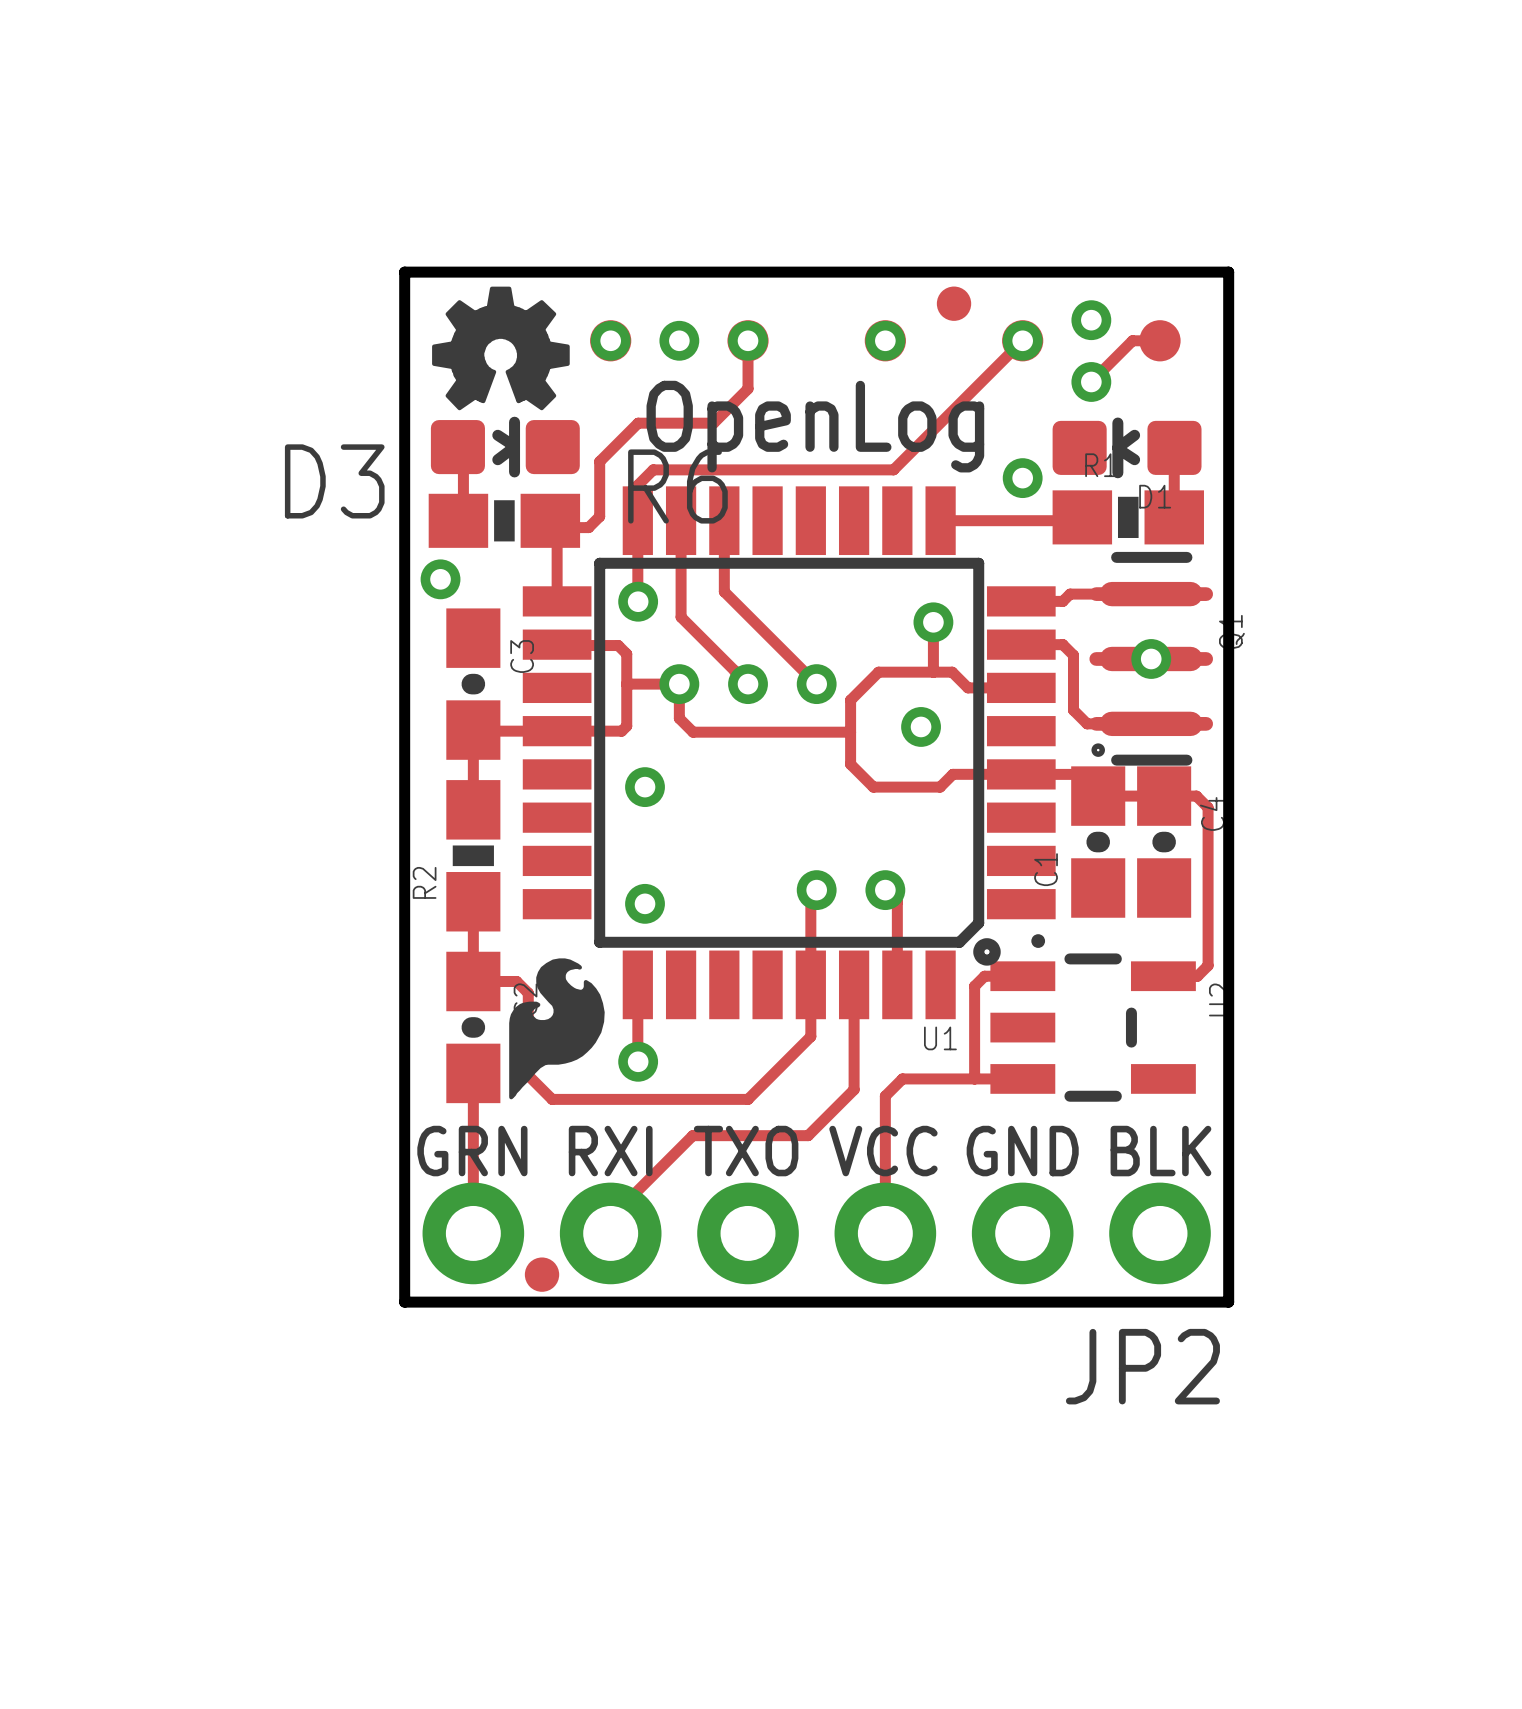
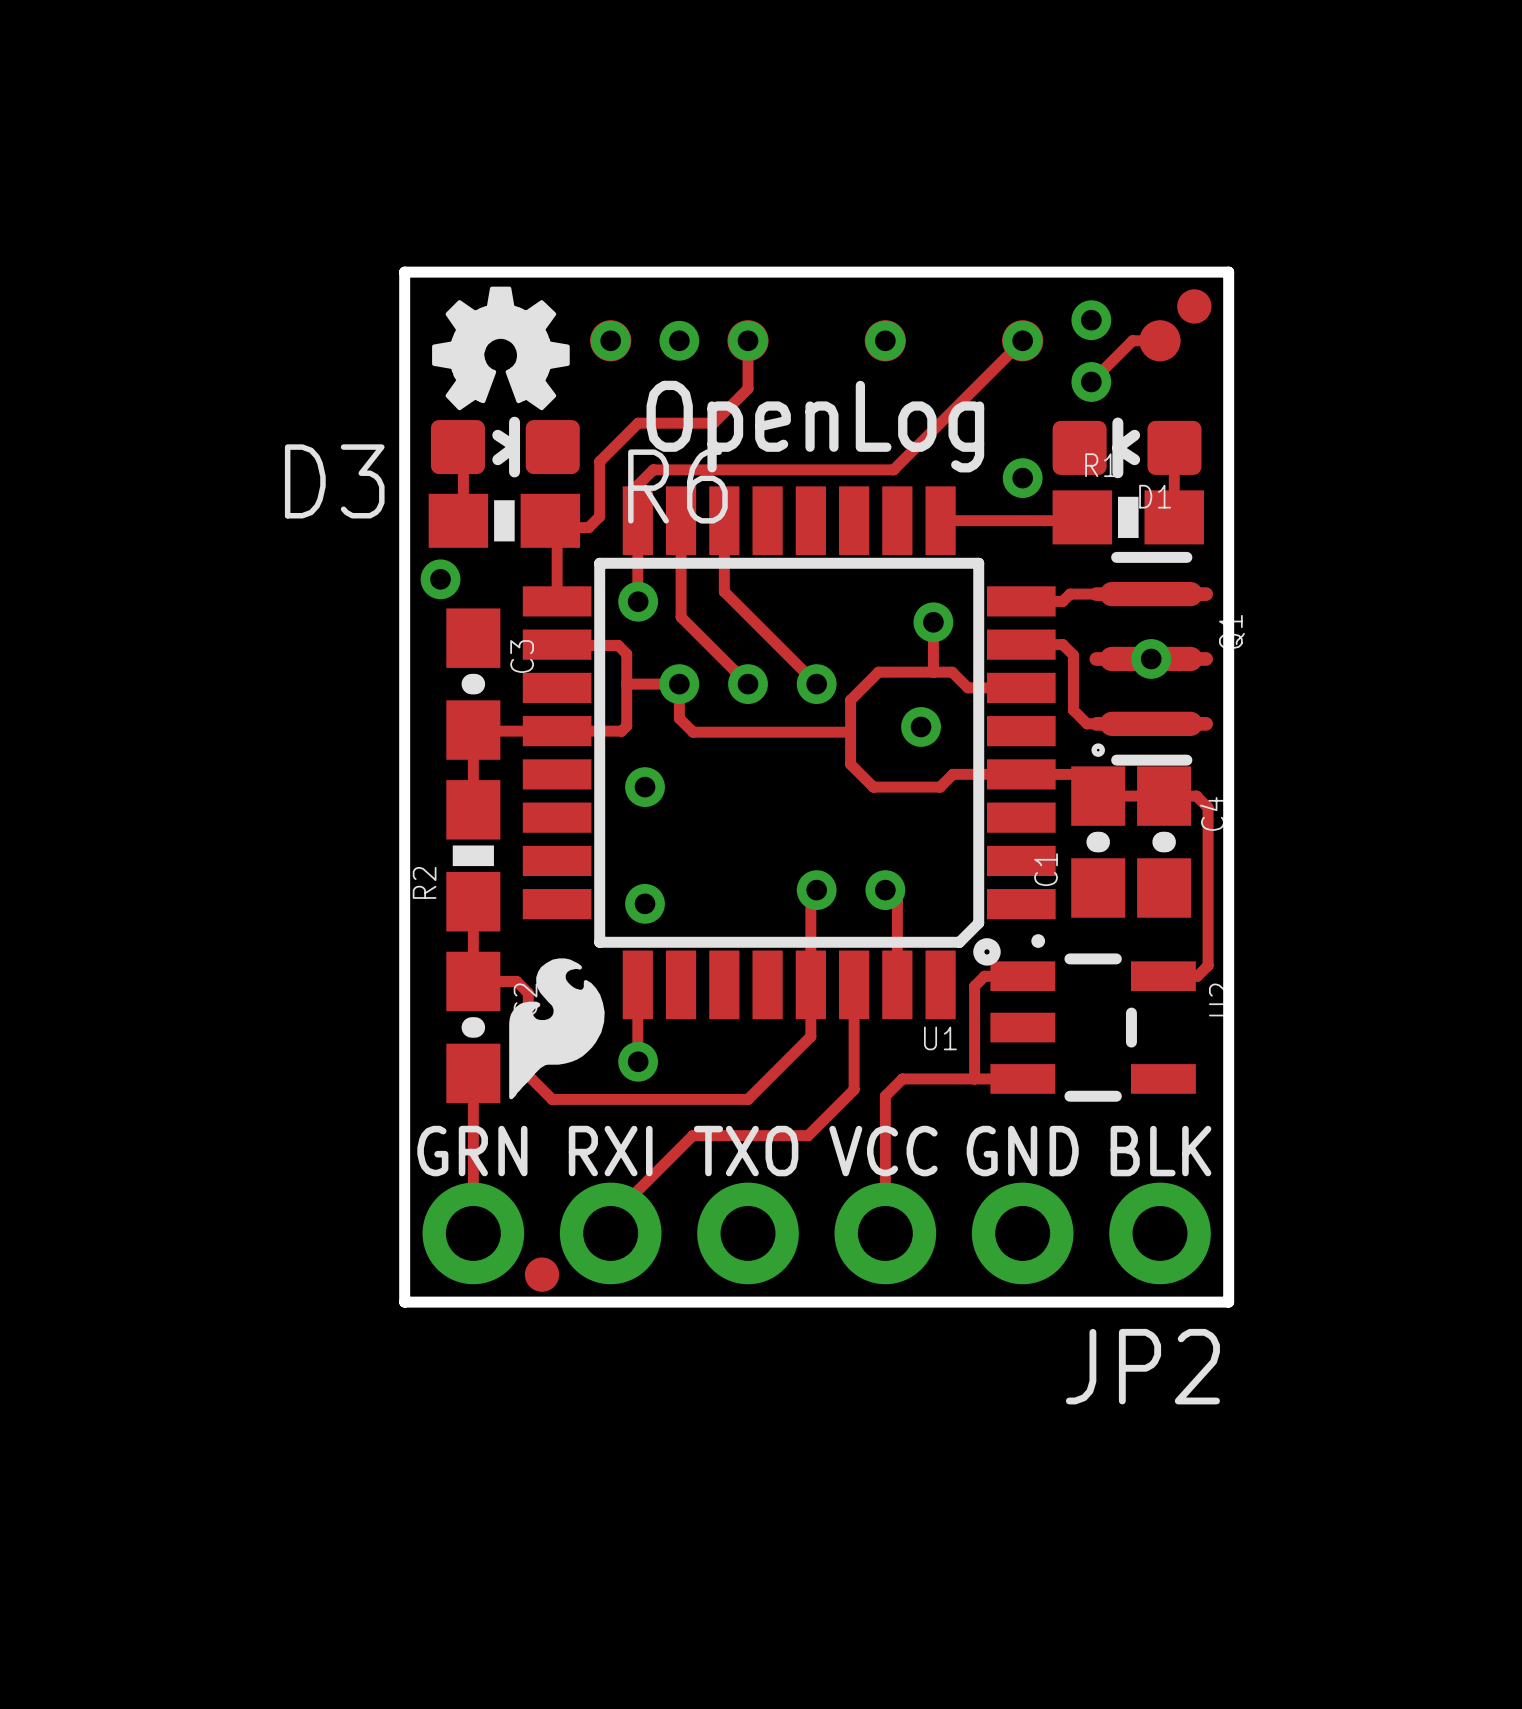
part position: (954, 303) -> (1194, 306)

